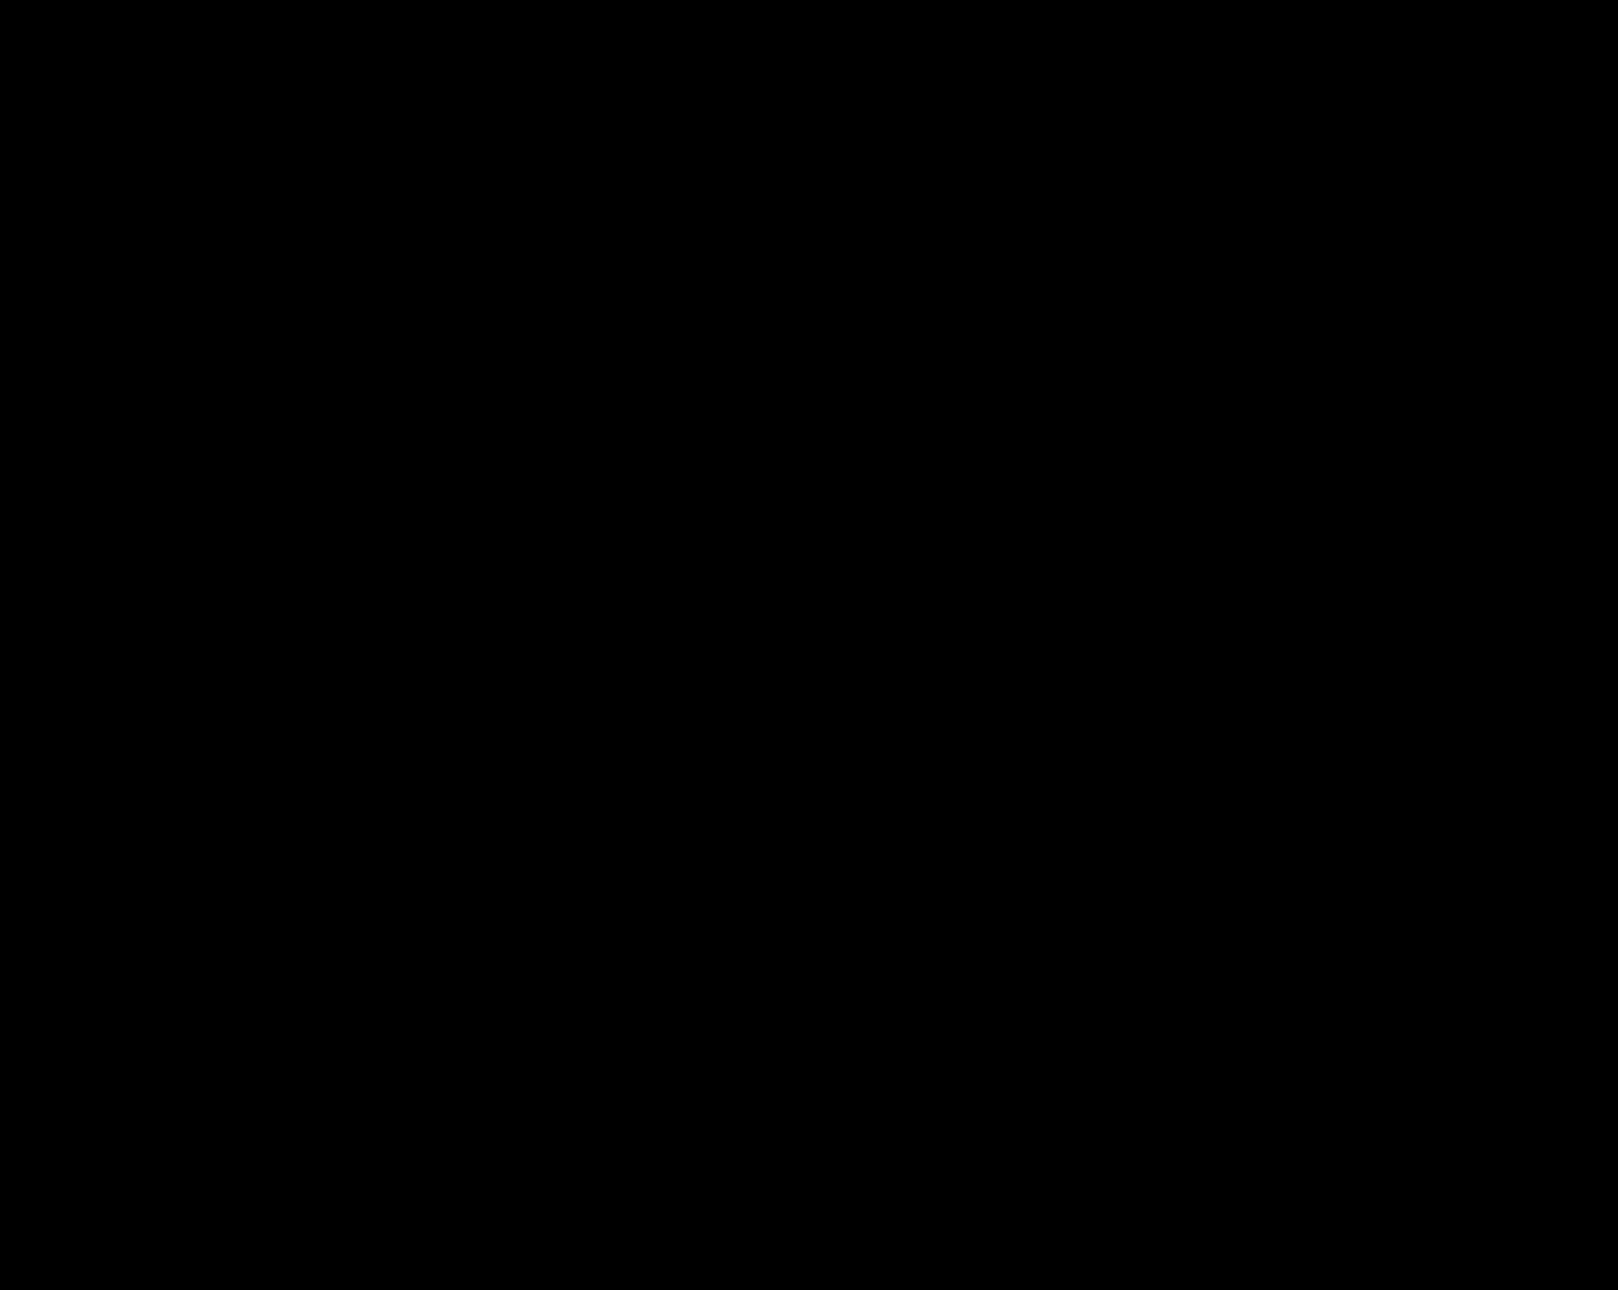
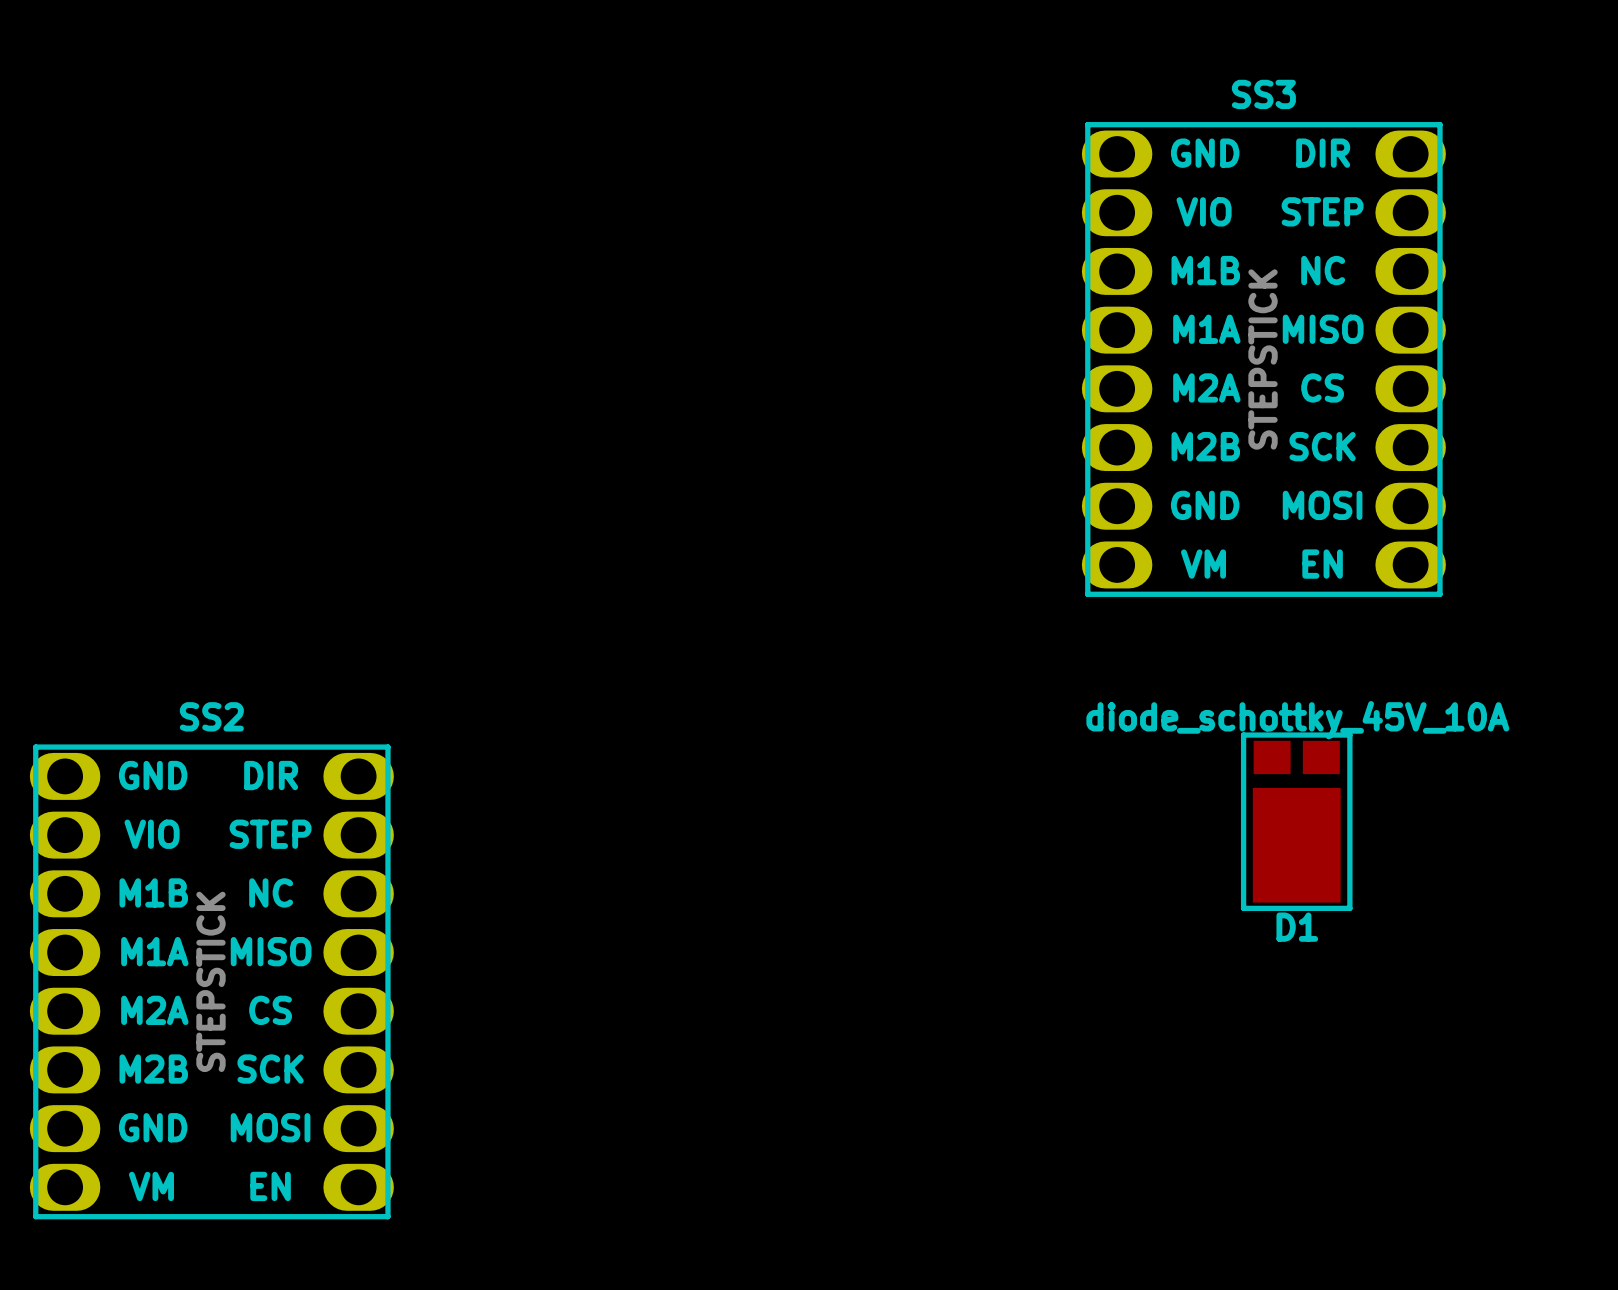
SS3: none -> STEPSTICK (1263, 359)
D1: none -> diode_schottky_45V_10A (1296, 821)
SS2: none -> STEPSTICK (211, 981)

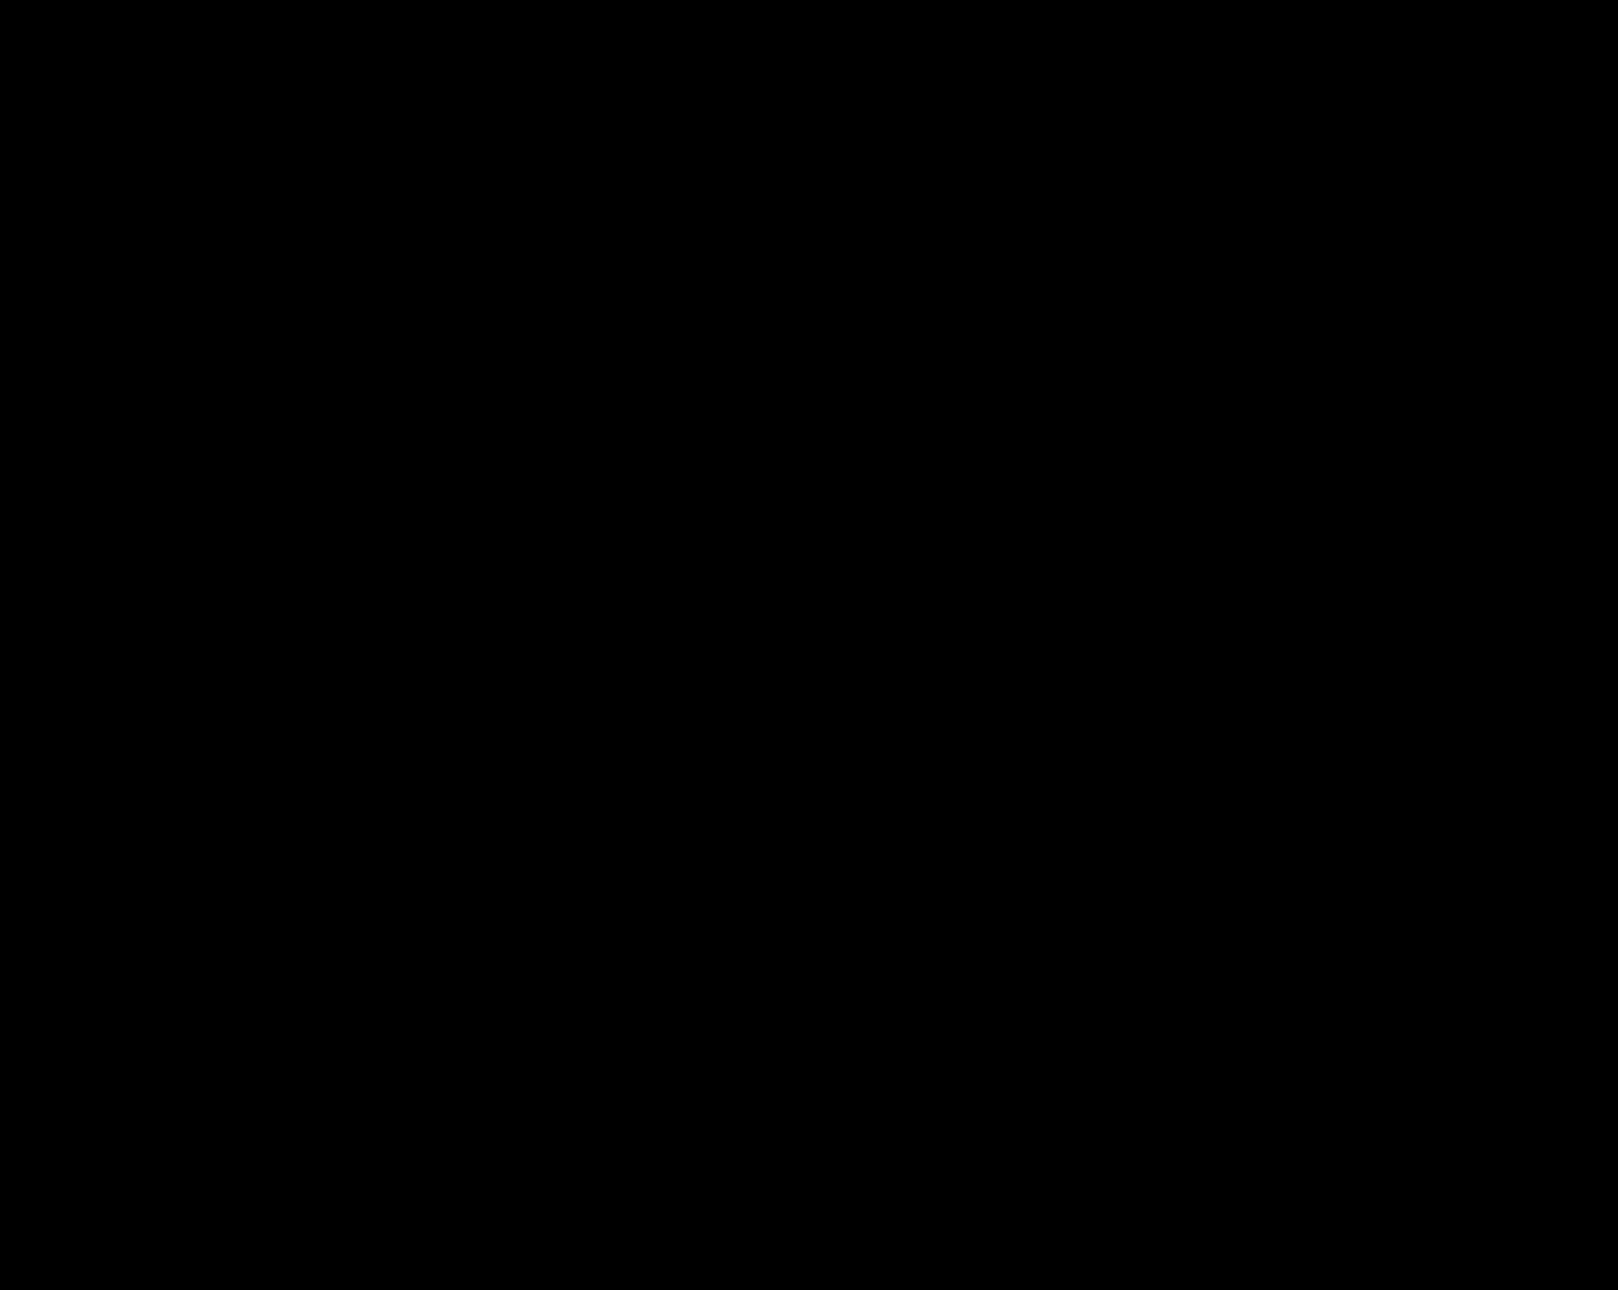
SS3: STEPSTICK (1263, 359) -> none
D1: diode_schottky_45V_10A (1296, 821) -> none
SS2: STEPSTICK (211, 981) -> none

